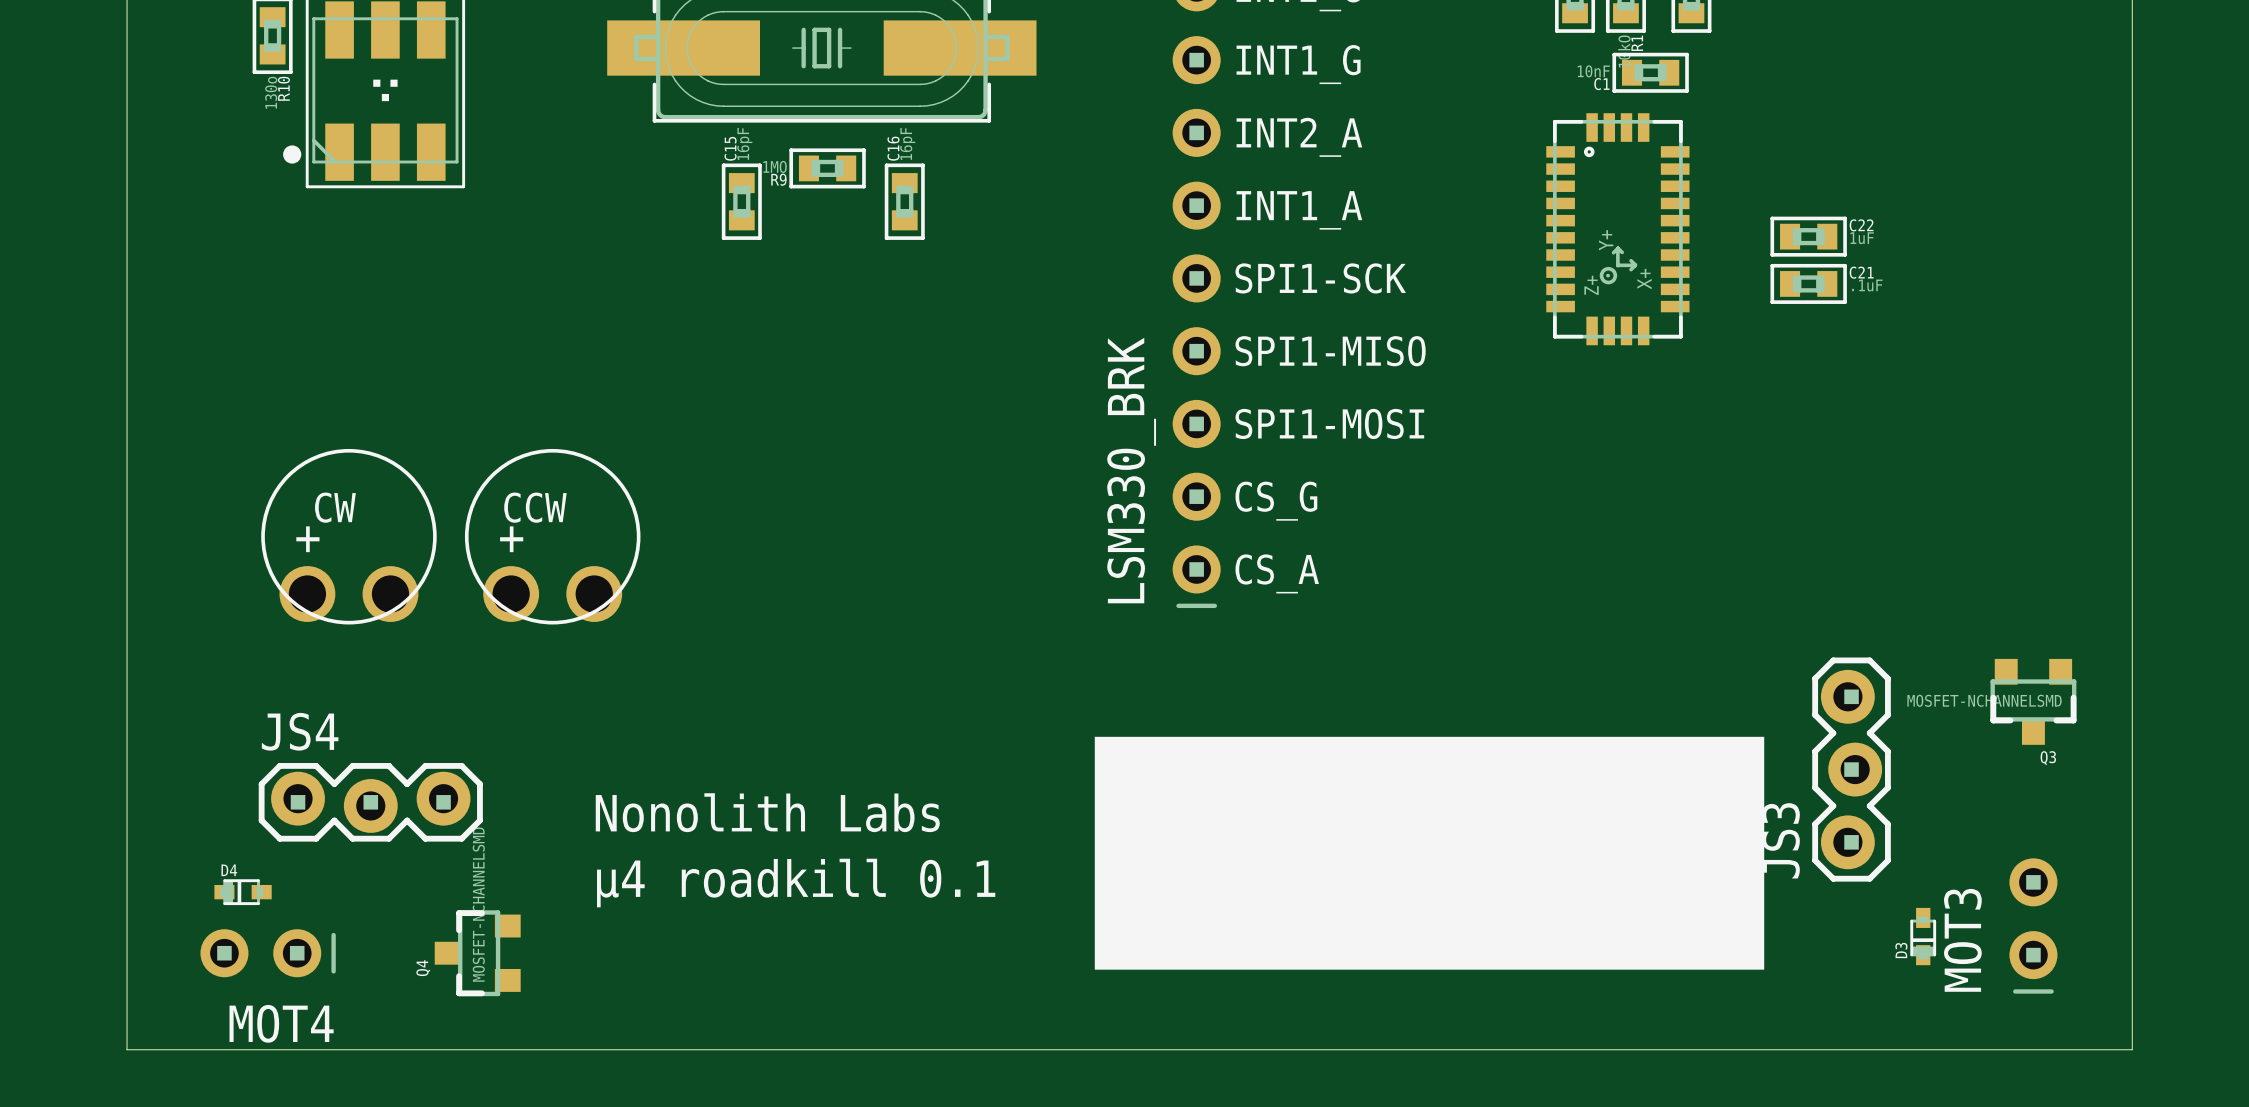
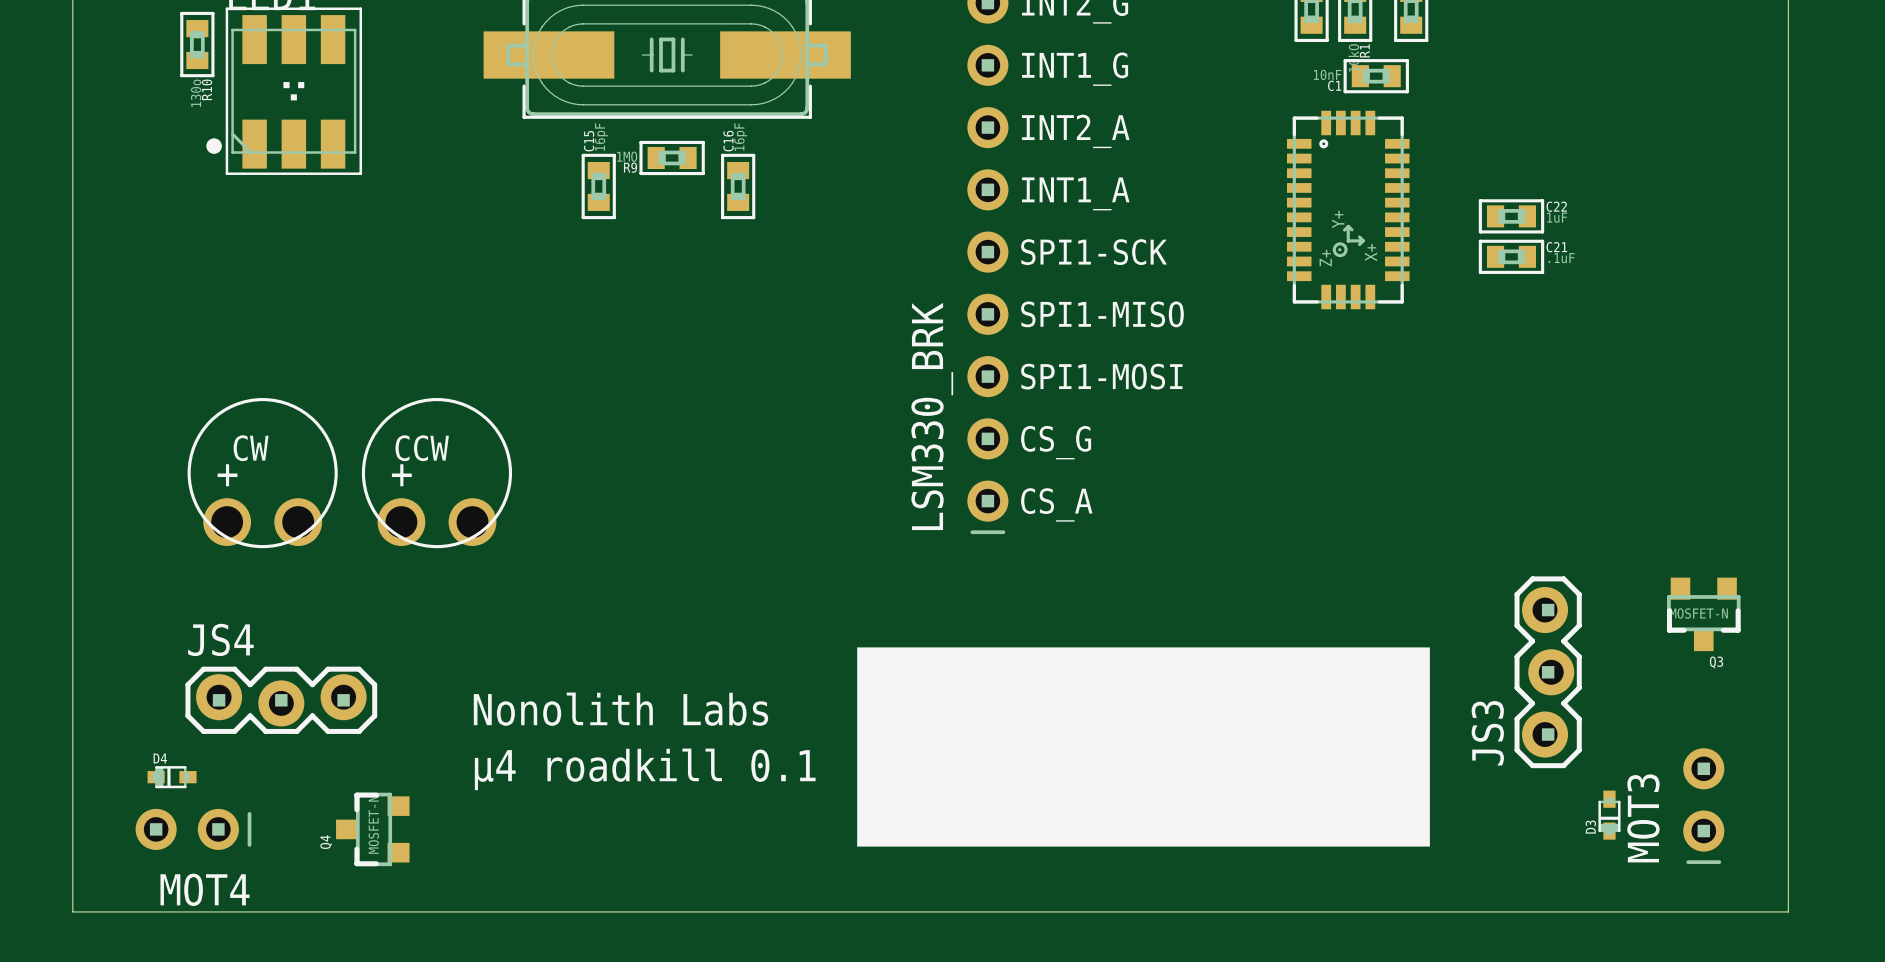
Q3 value: MOSFET-NCHANNELSMD (1984, 700) -> MOSFET-N (1698, 613)
drawing position: (1429, 853) -> (1143, 746)
Q4 value: MOSFET-NCHANNELSMD (478, 904) -> MOSFET-N (373, 824)

